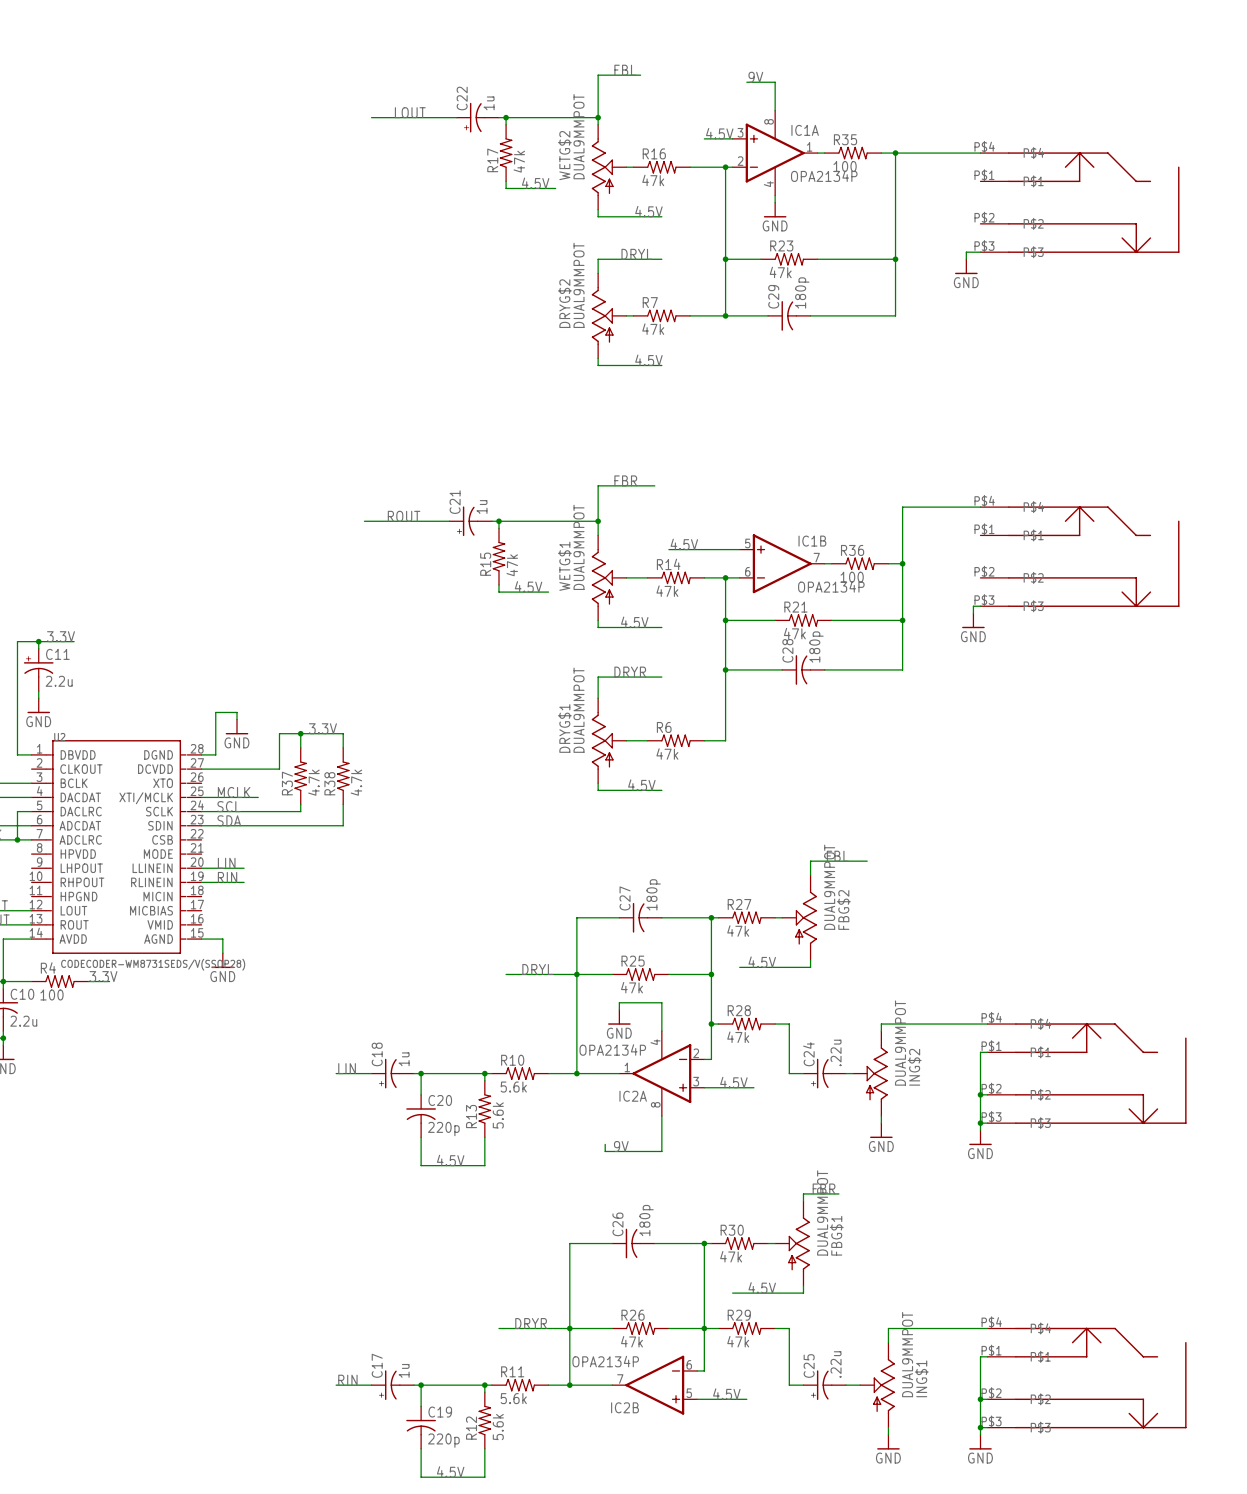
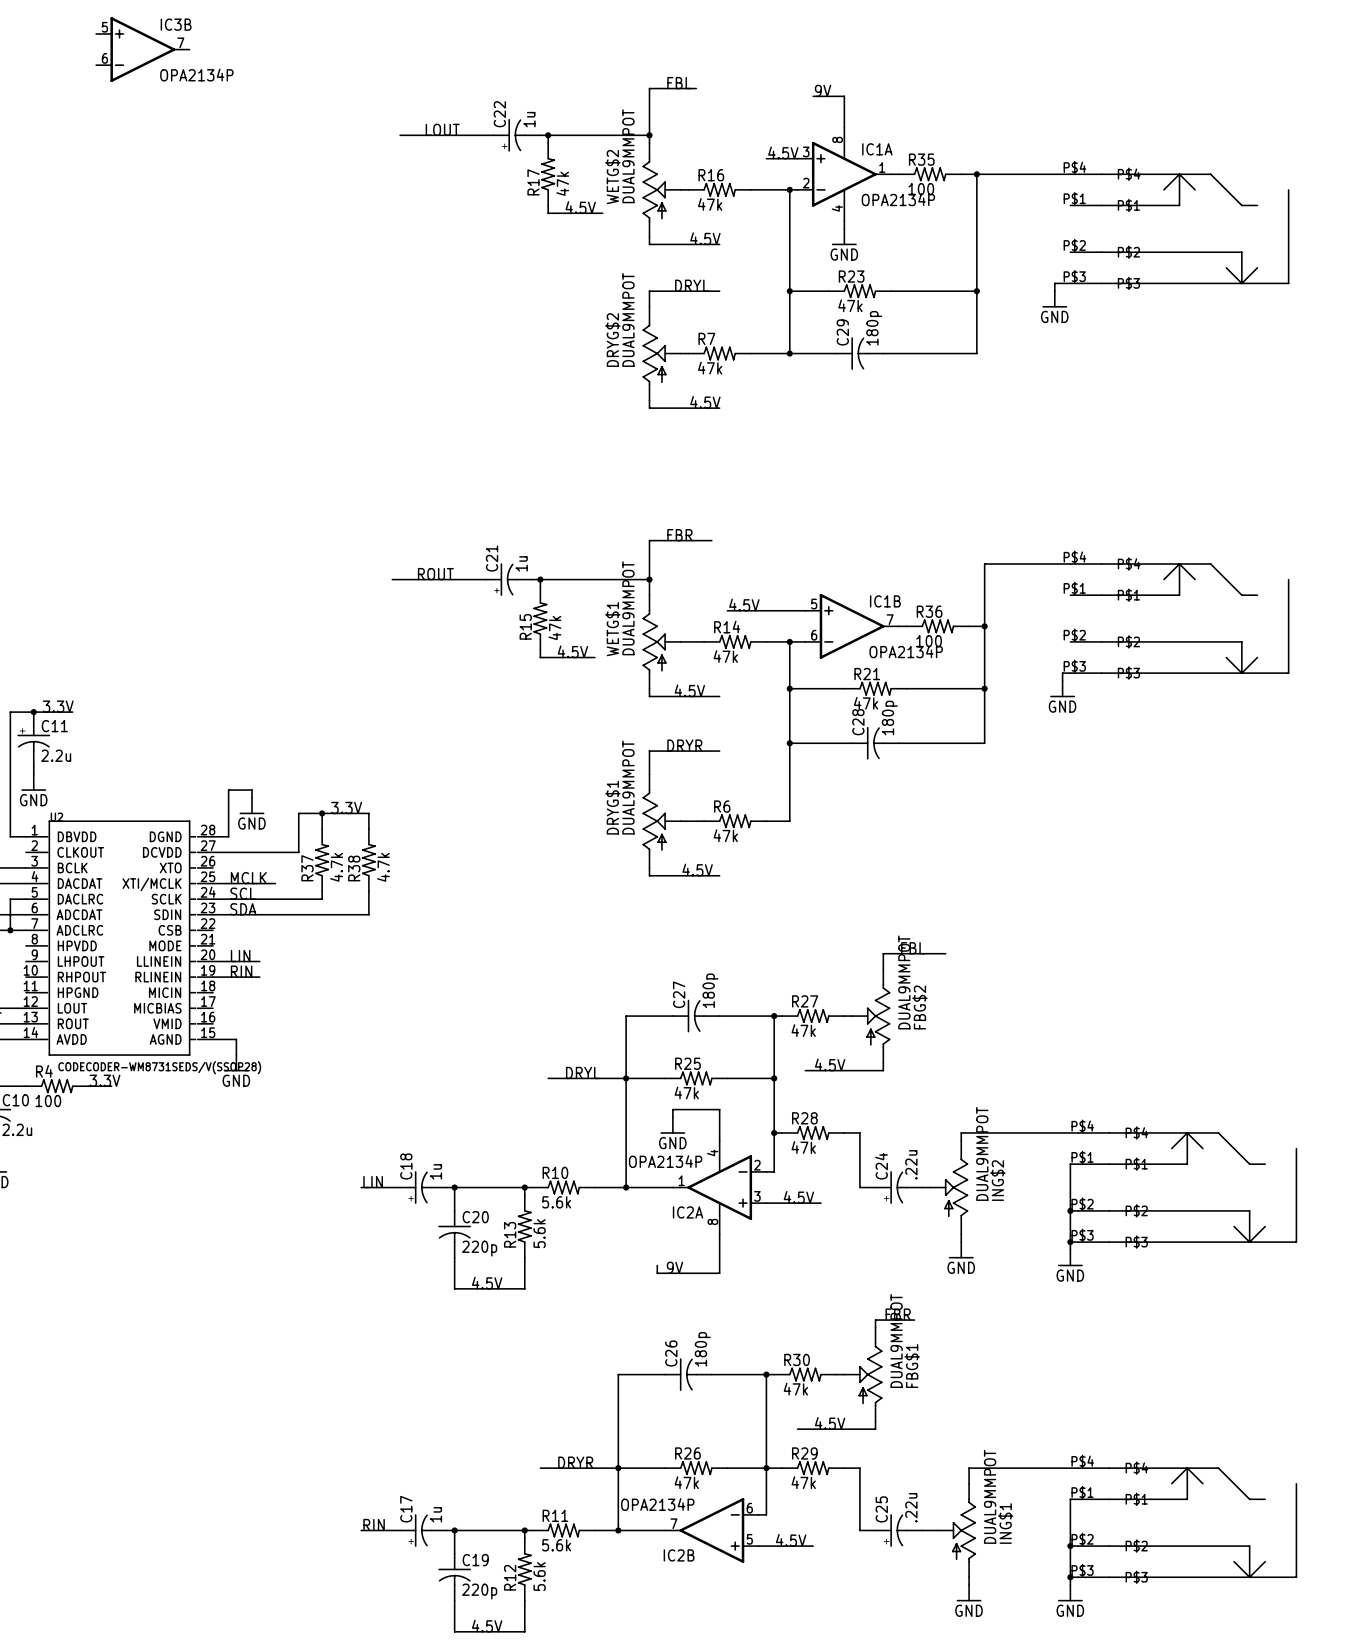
IC3B: none -> OPA2134P (142, 49)

